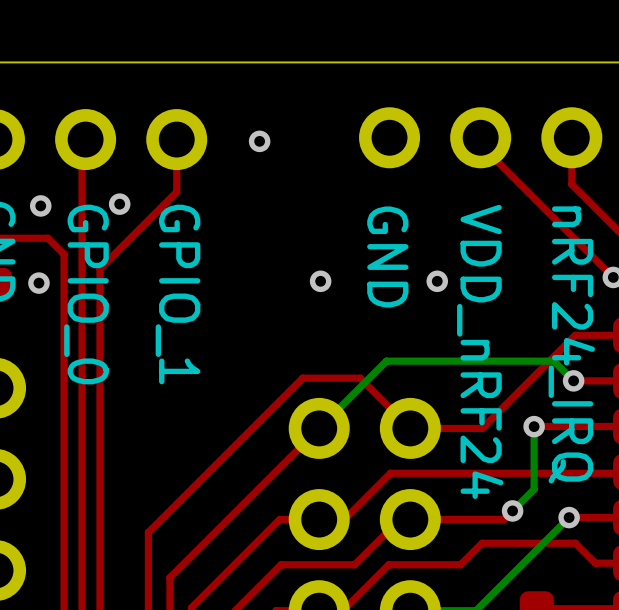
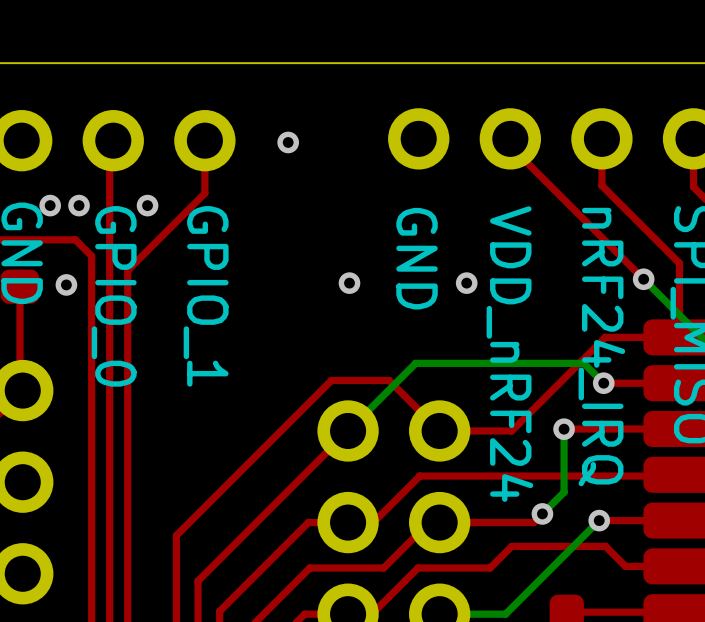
via: none -> (50, 205)
via: none -> (79, 205)
via: (40, 205) -> none

